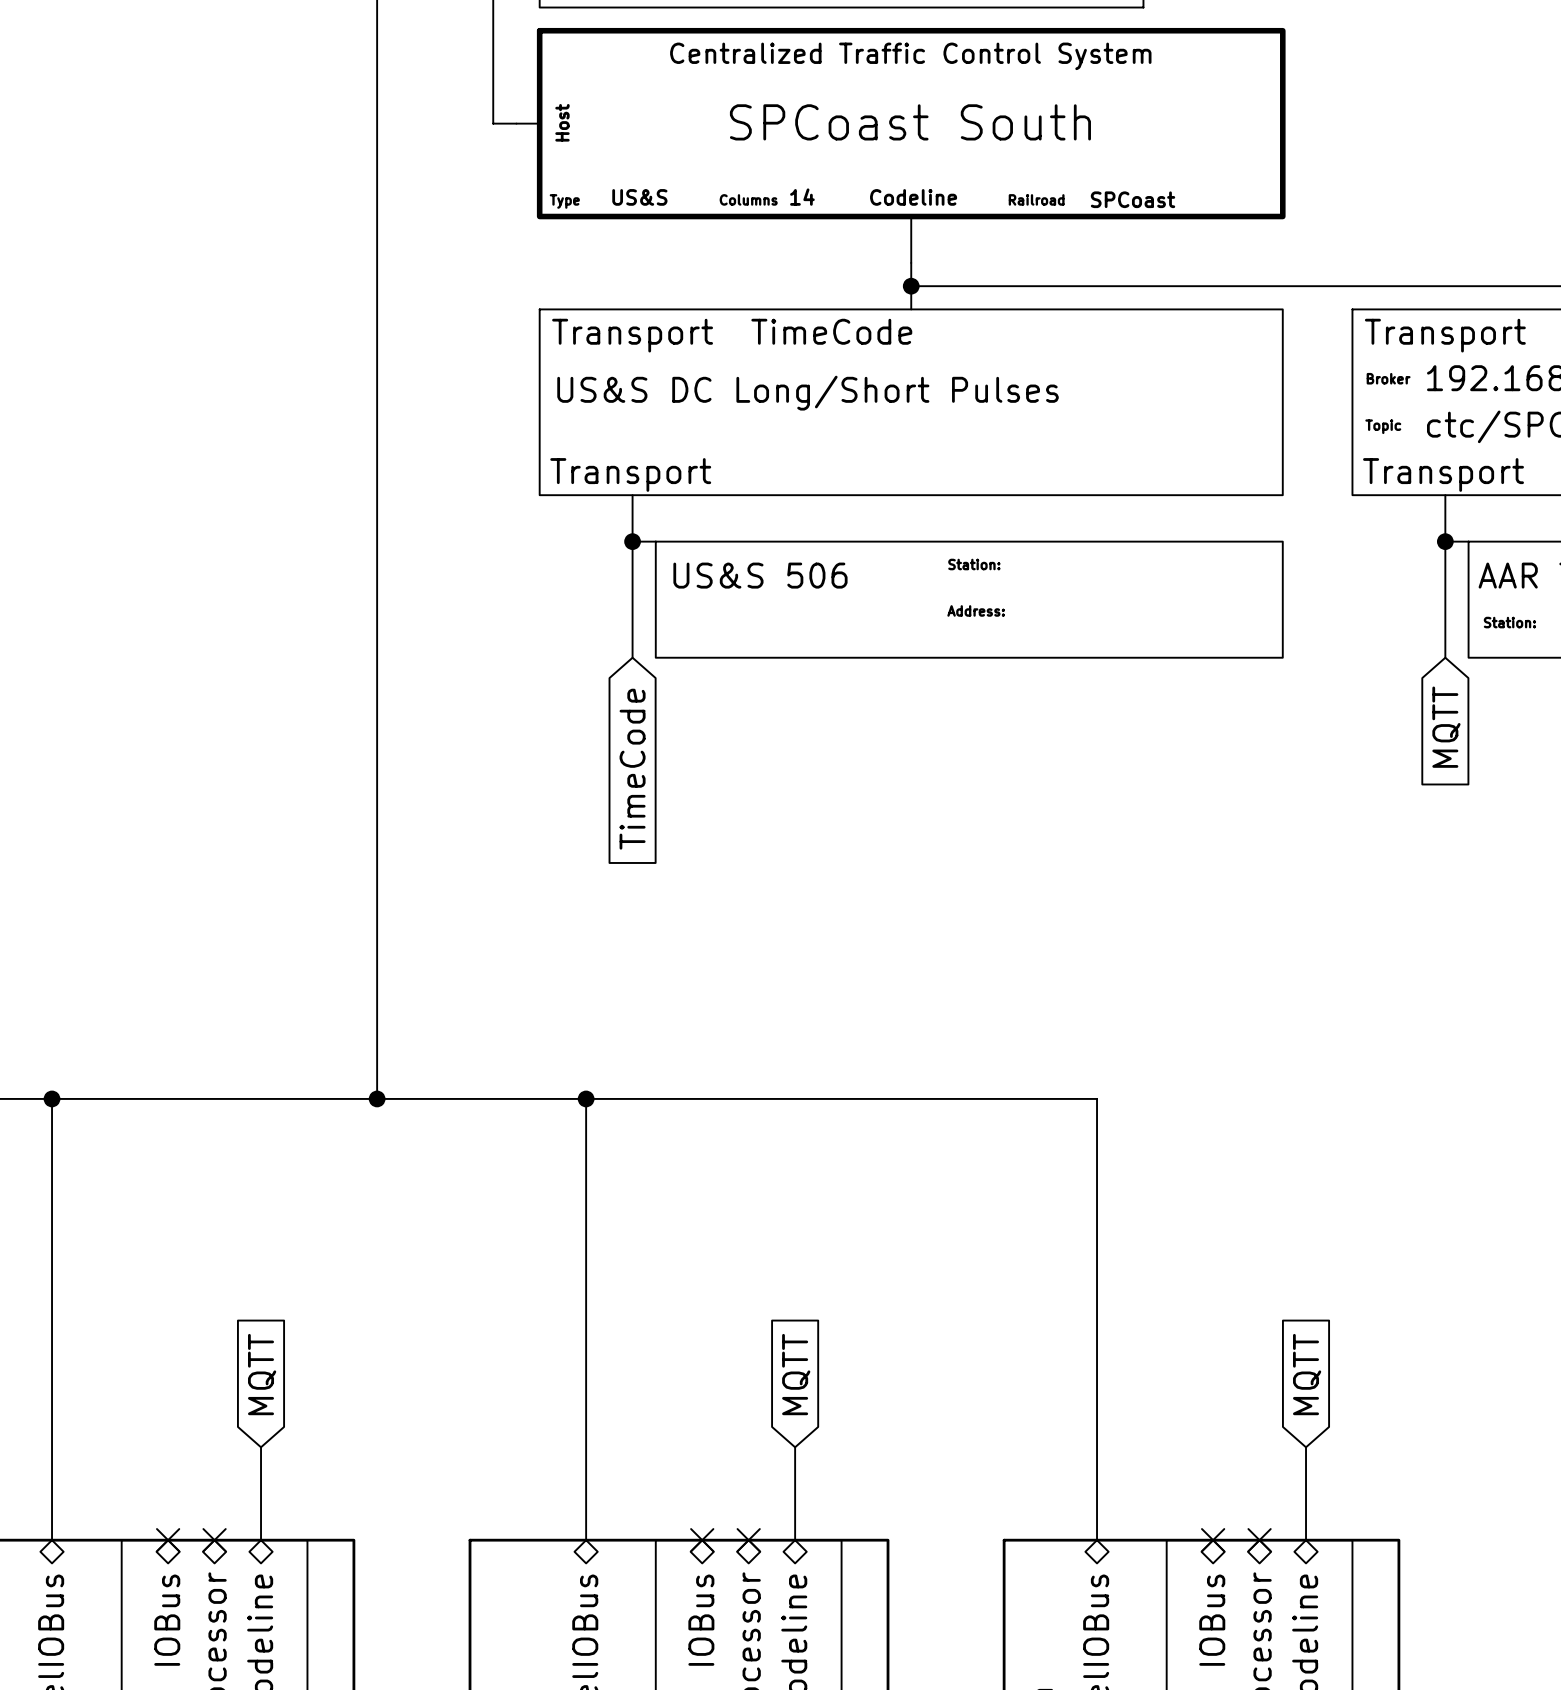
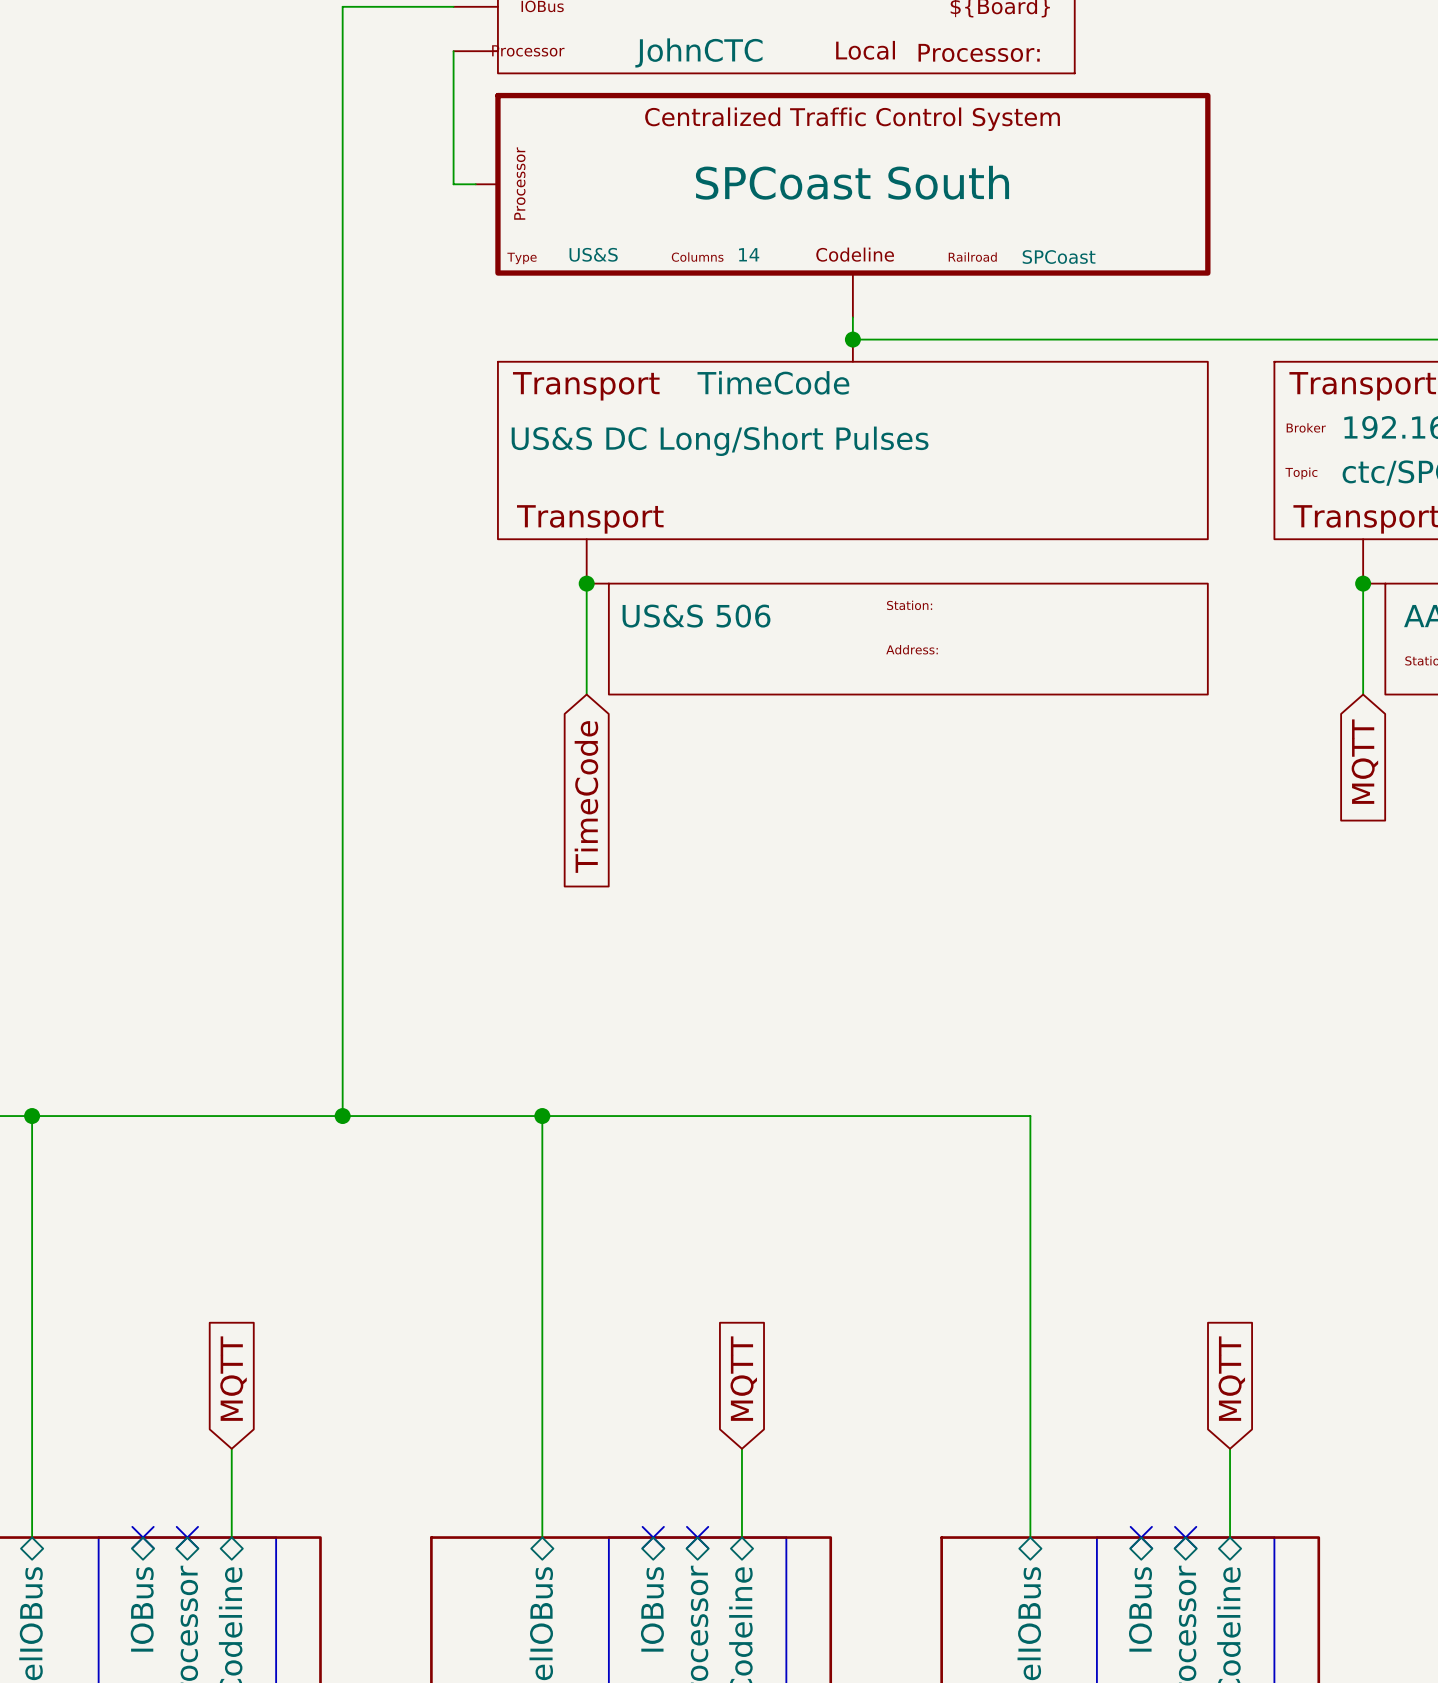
part text: Host (562, 122) -> Processor (519, 183)

